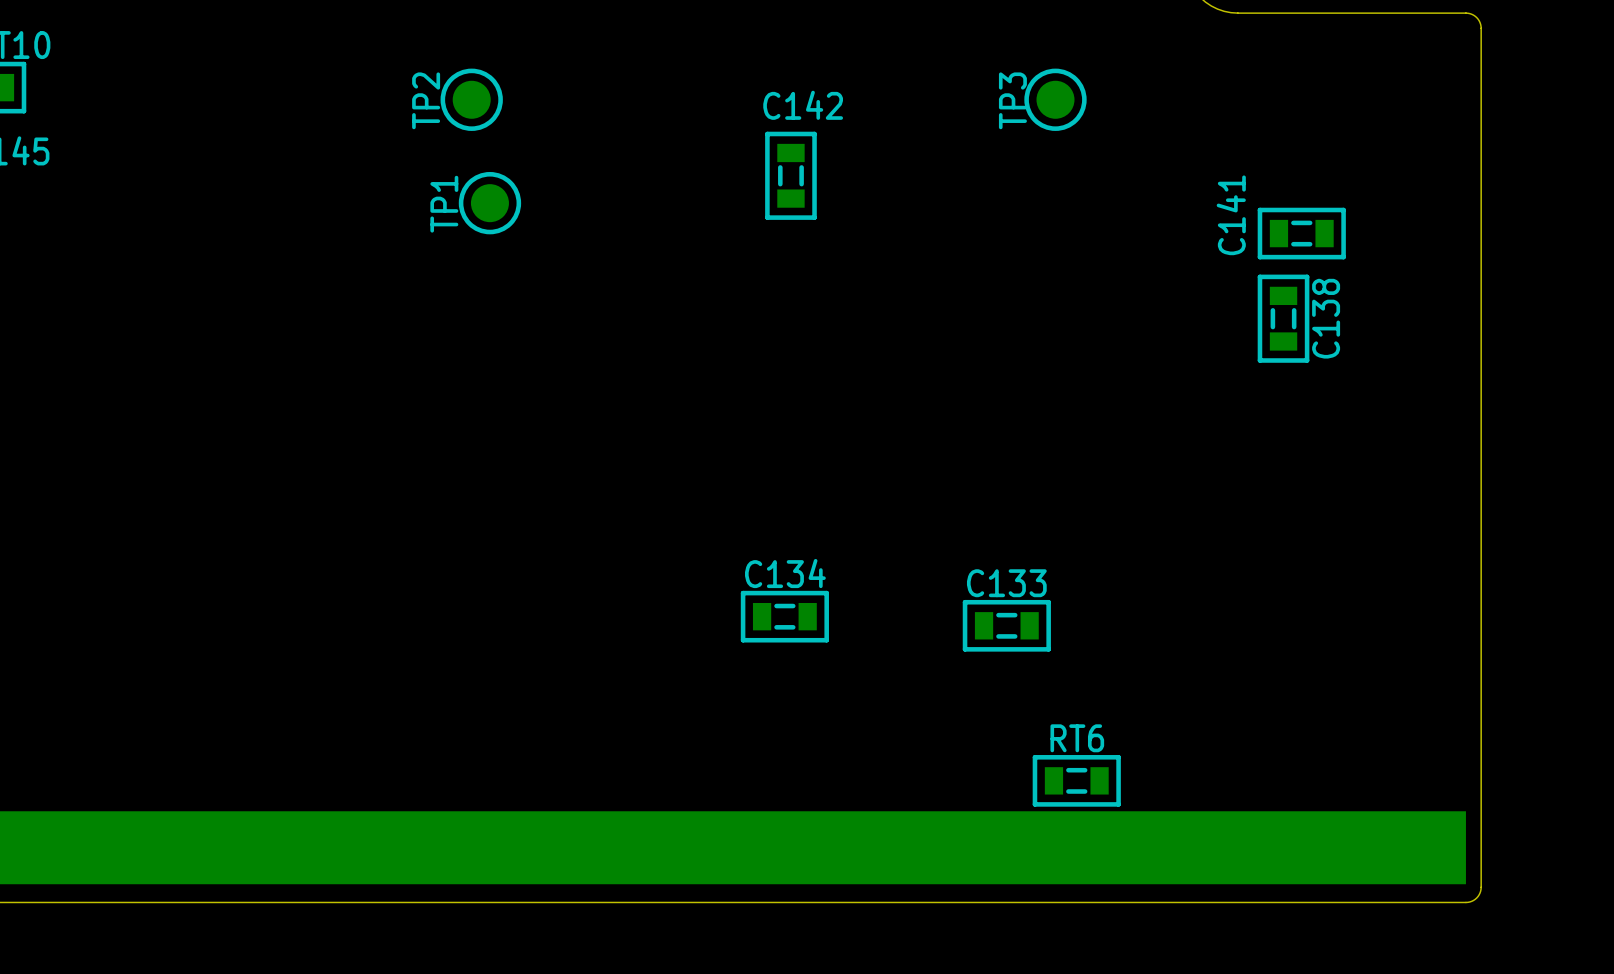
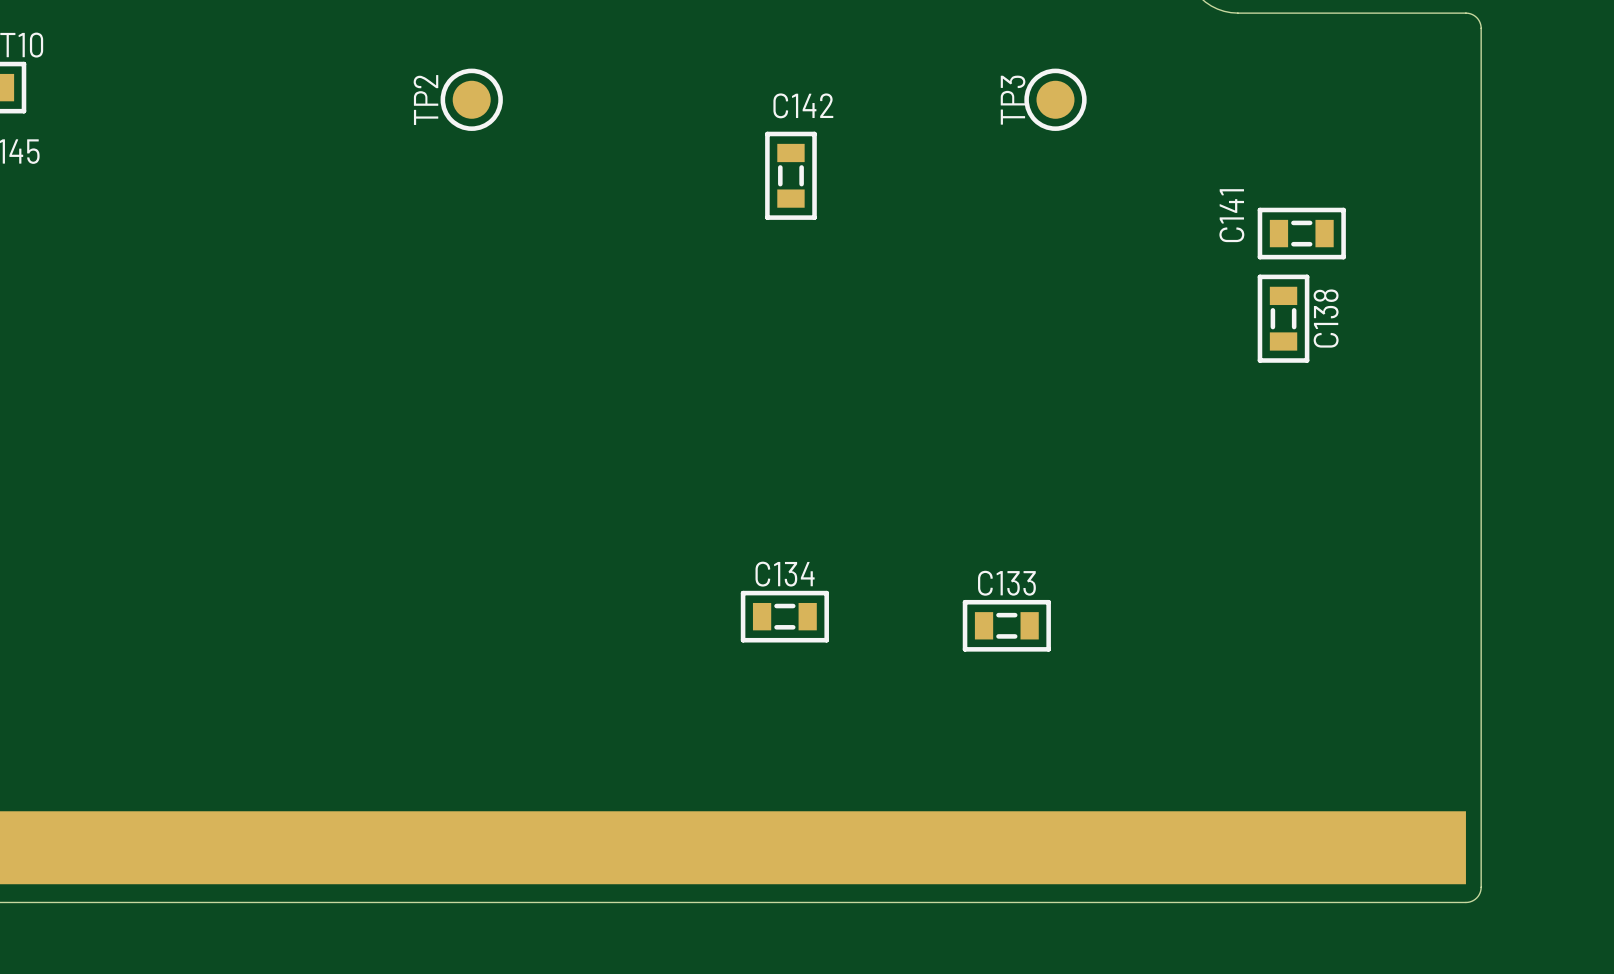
TP1: (489, 203) -> none
RT6: (1076, 780) -> none

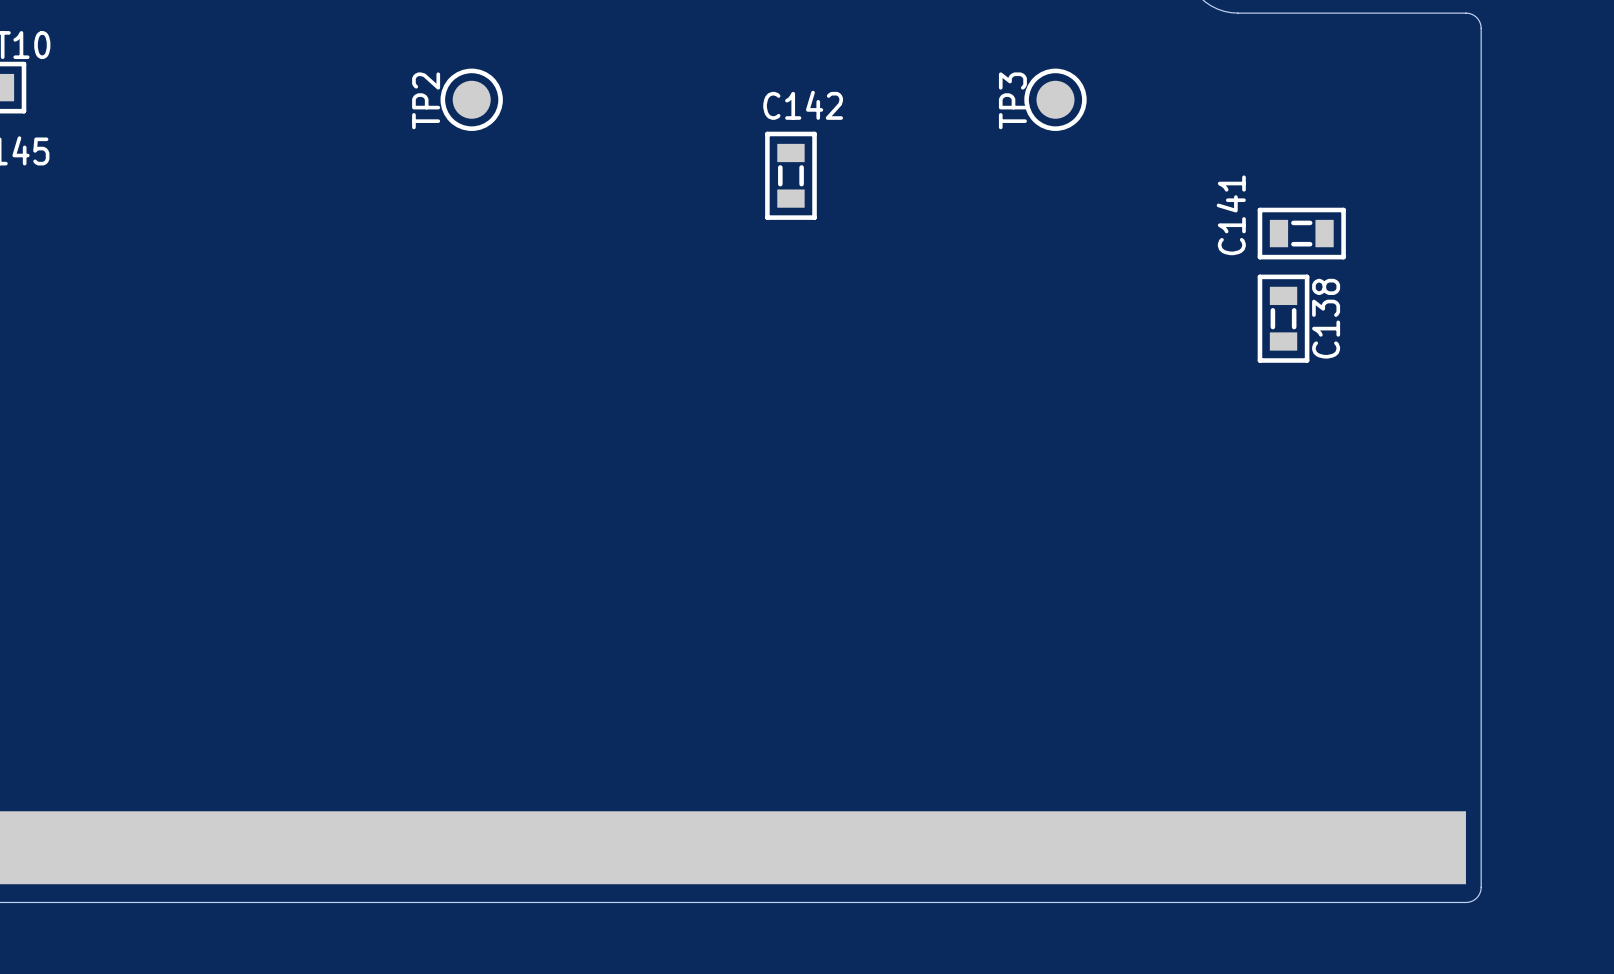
C134: (784, 616) -> none
C133: (1006, 625) -> none

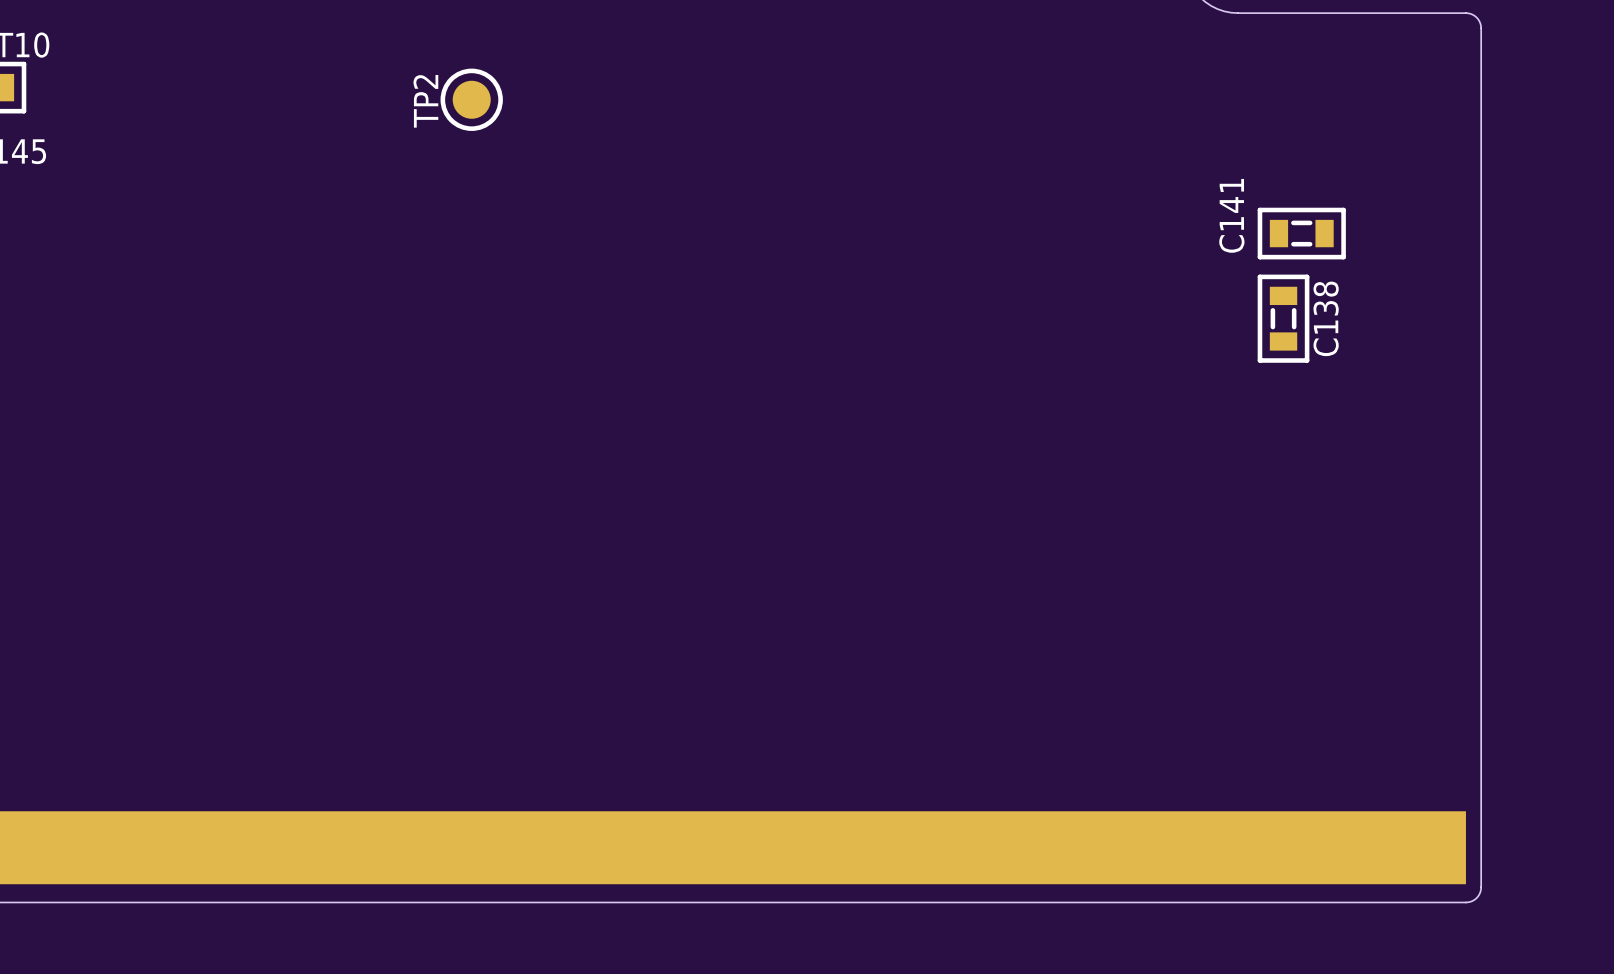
TP3: (1055, 99) -> none
C142: (790, 175) -> none

